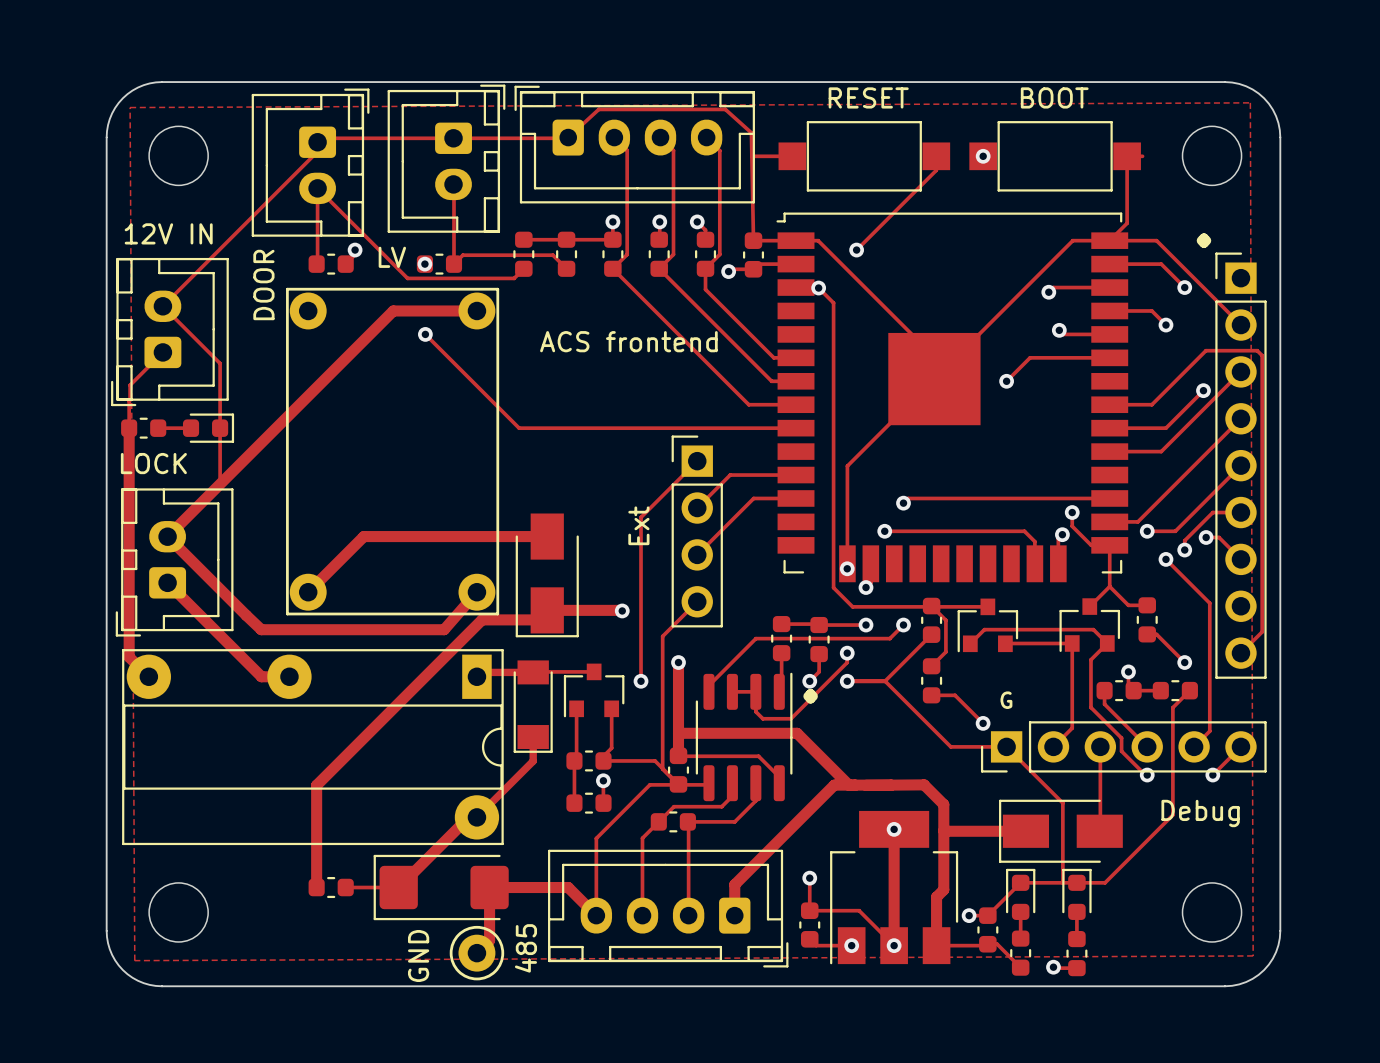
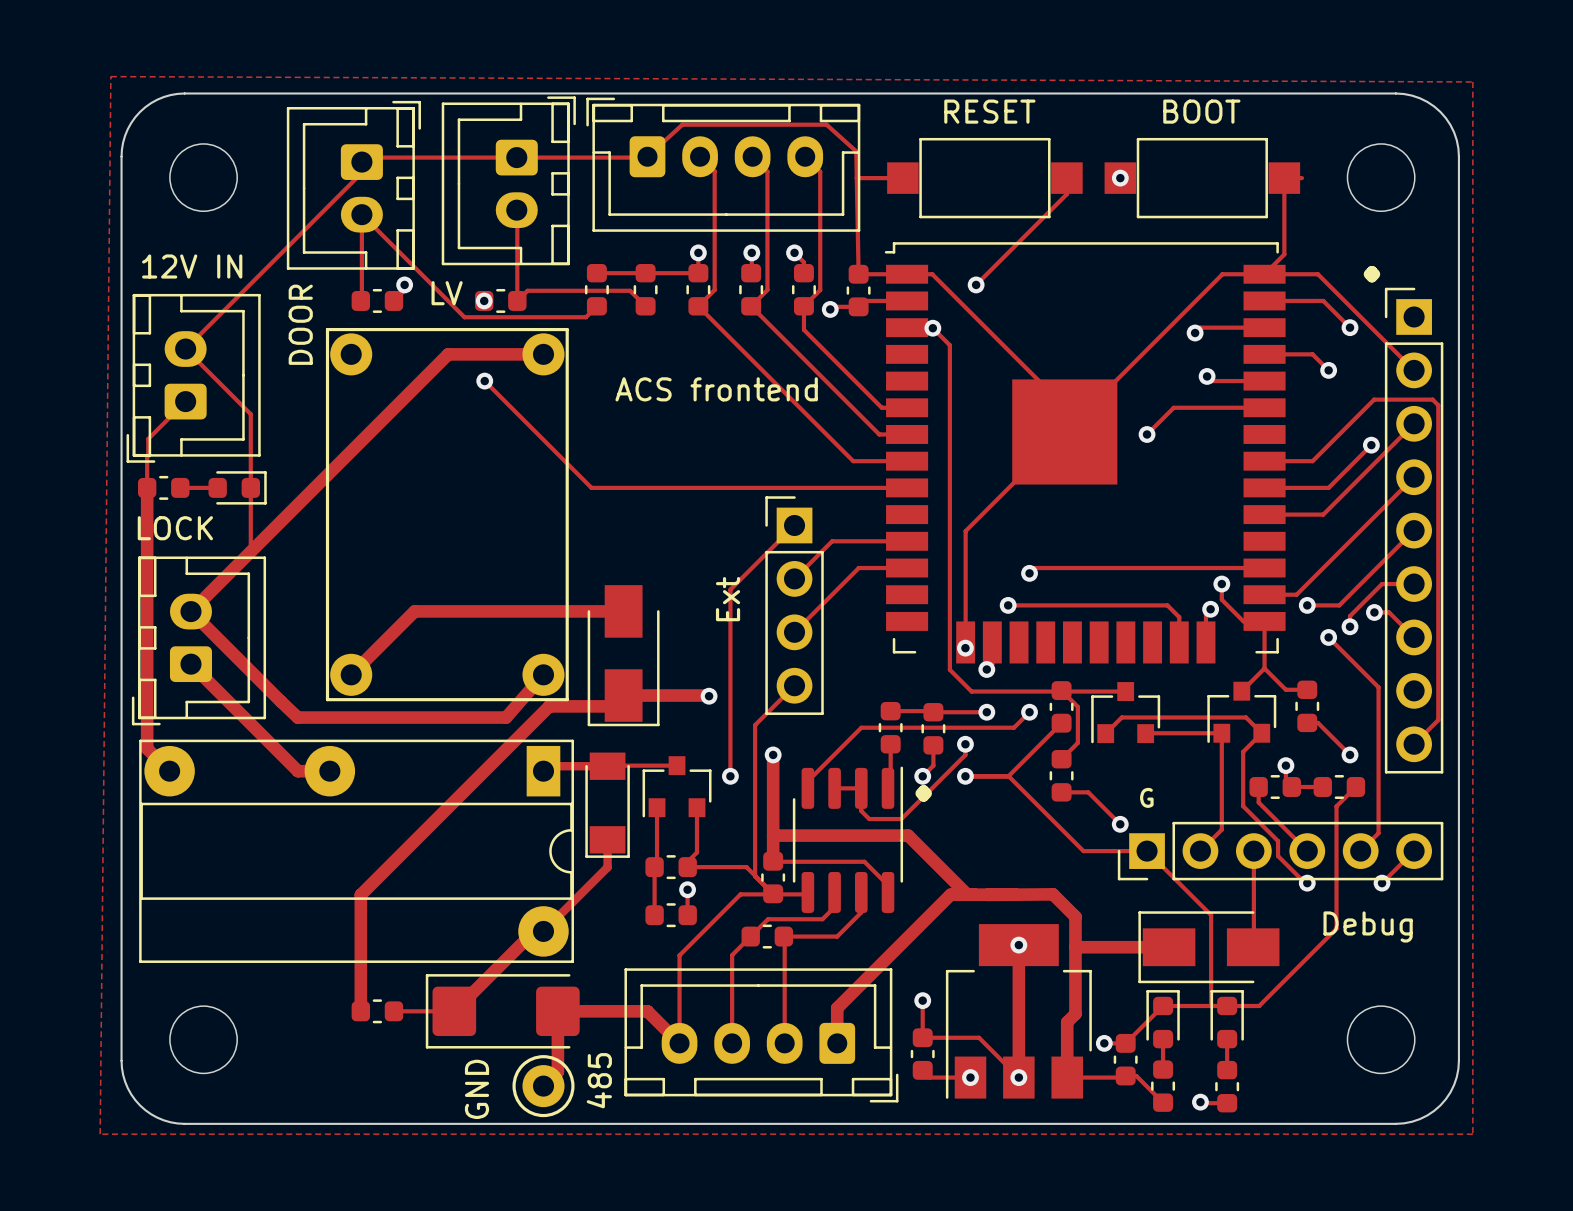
zone outline: (1250, 102) (130, 107) (134, 960) (1253, 955) (1250, 102) -> (110, 76) (100, 1134) (1472, 1134) (1472, 81) (110, 76)

